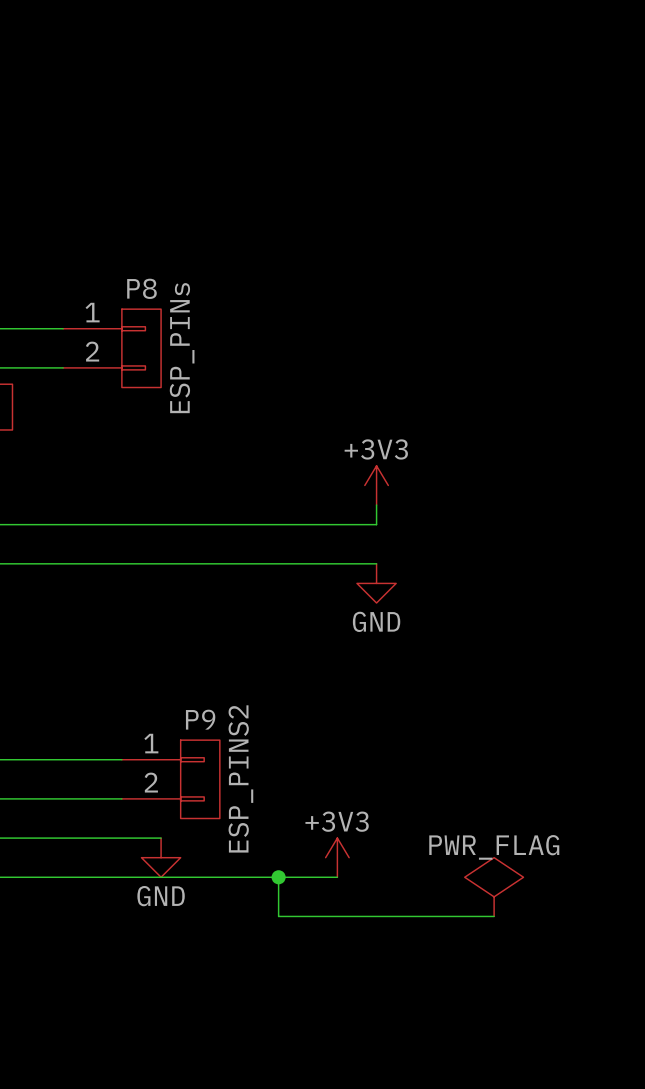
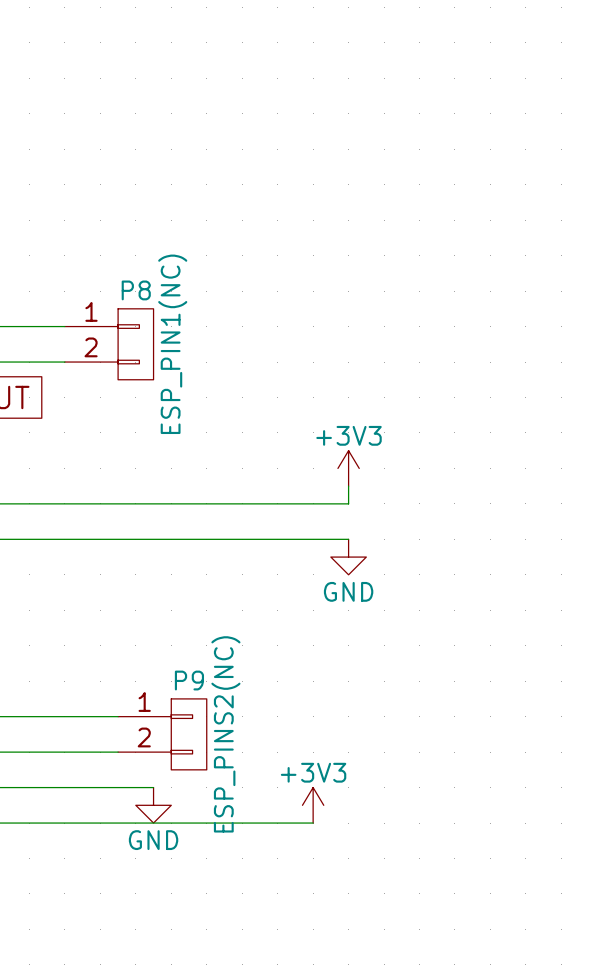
P8 value: ESP_PINs (182, 348) -> ESP_PIN1(NC) (172, 344)
P9 value: ESP_PINS2 (240, 778) -> ESP_PINS2(NC) (225, 734)
wire: (278, 877) (278, 916) (494, 916) -> none
junction: (278, 877) -> none
power symbol: PWR_FLAG (494, 887) -> none

